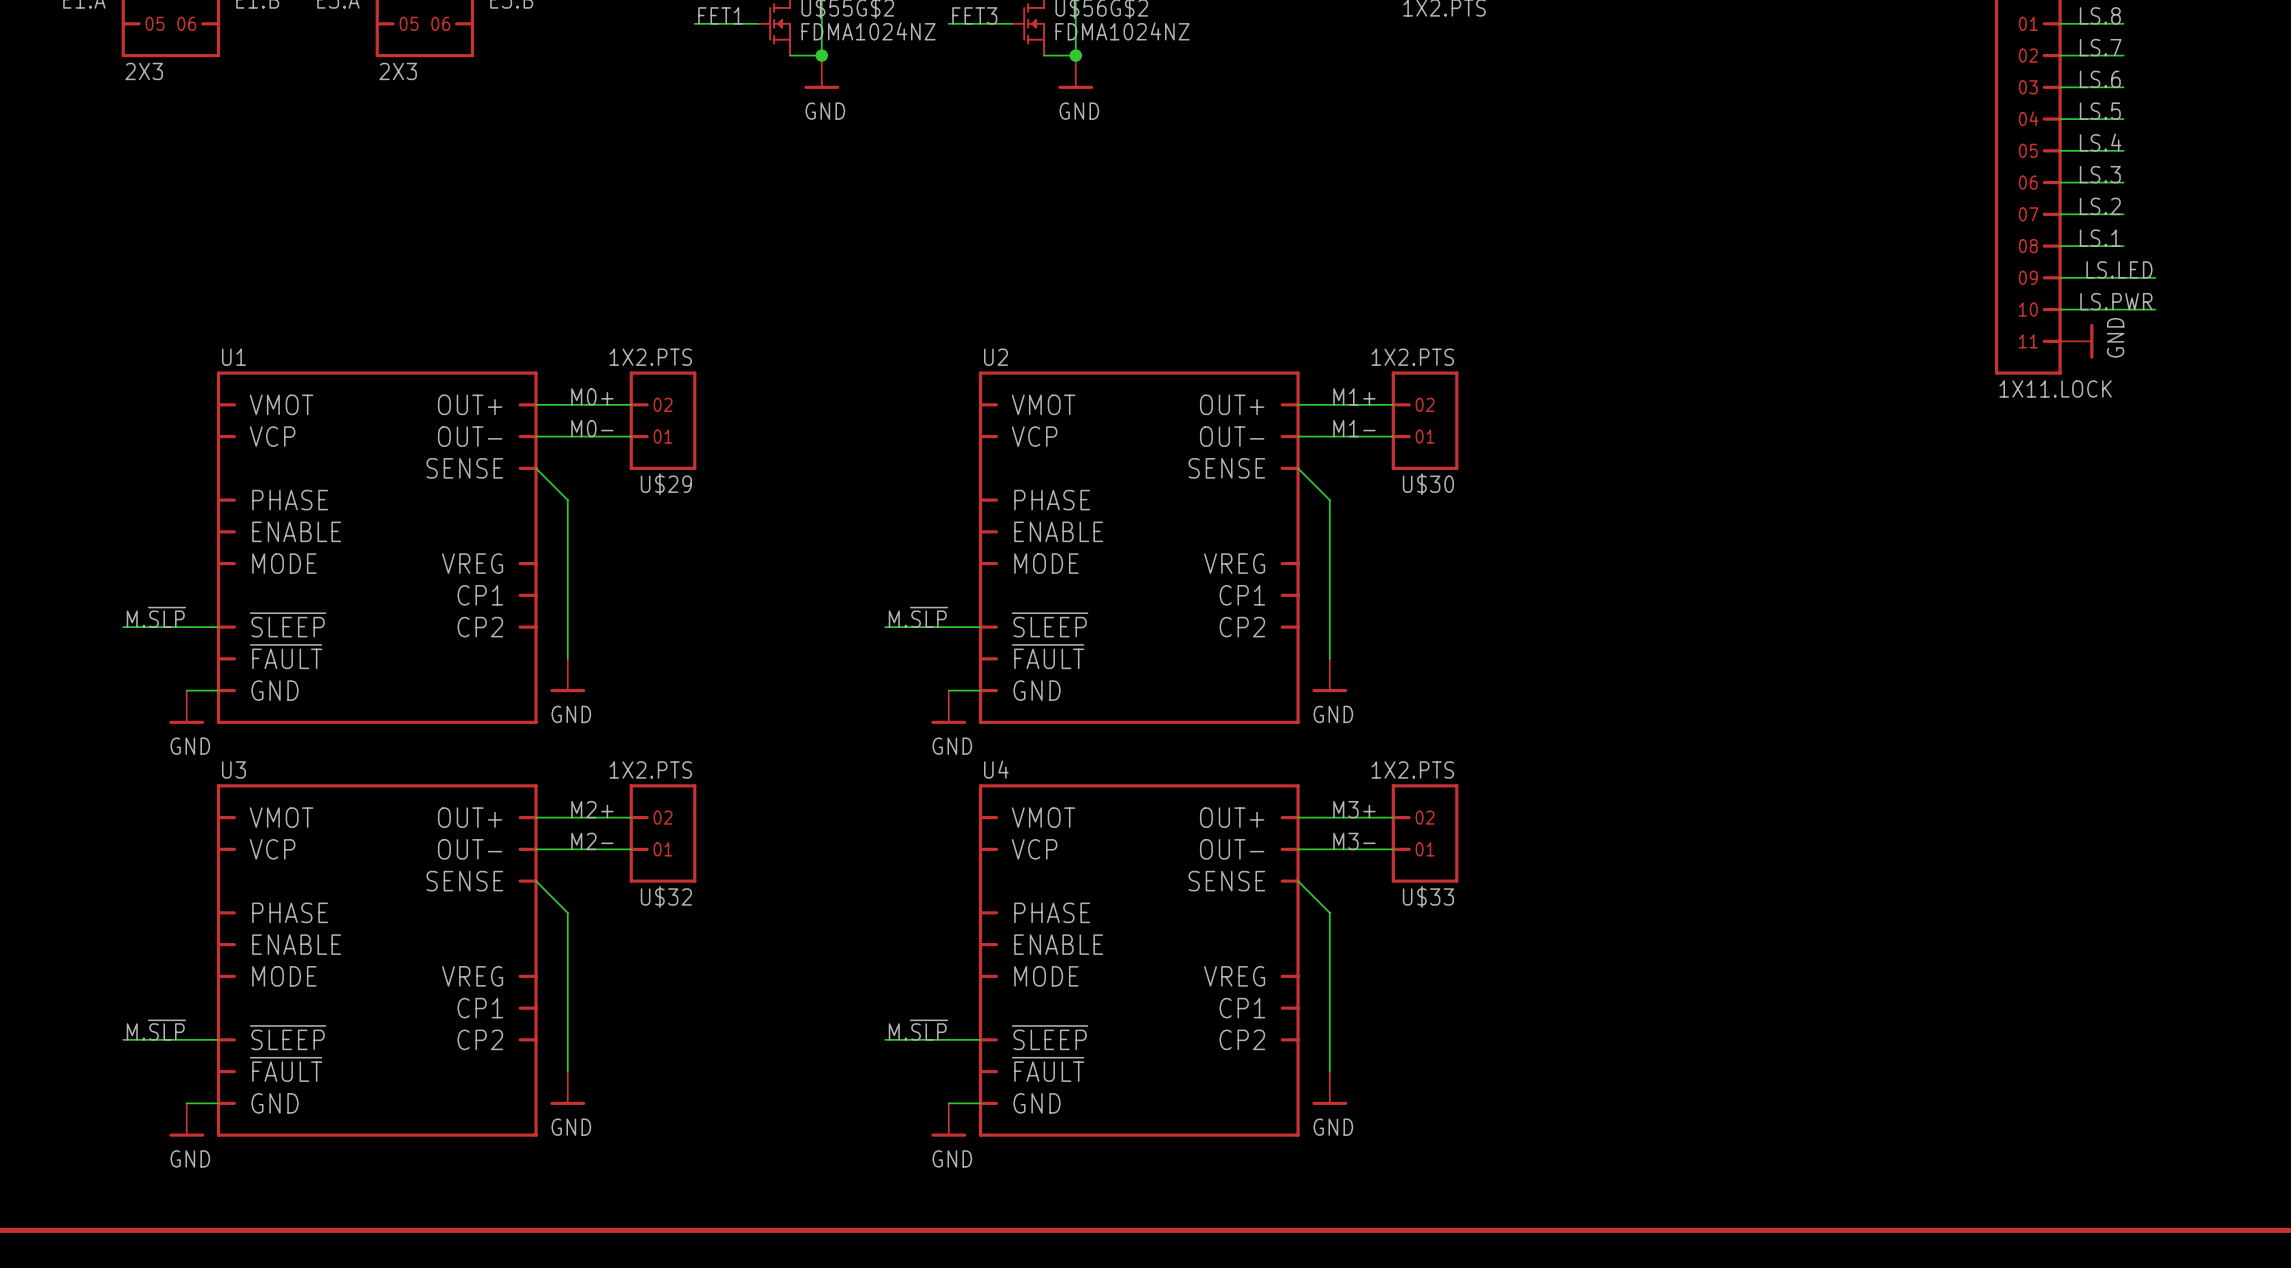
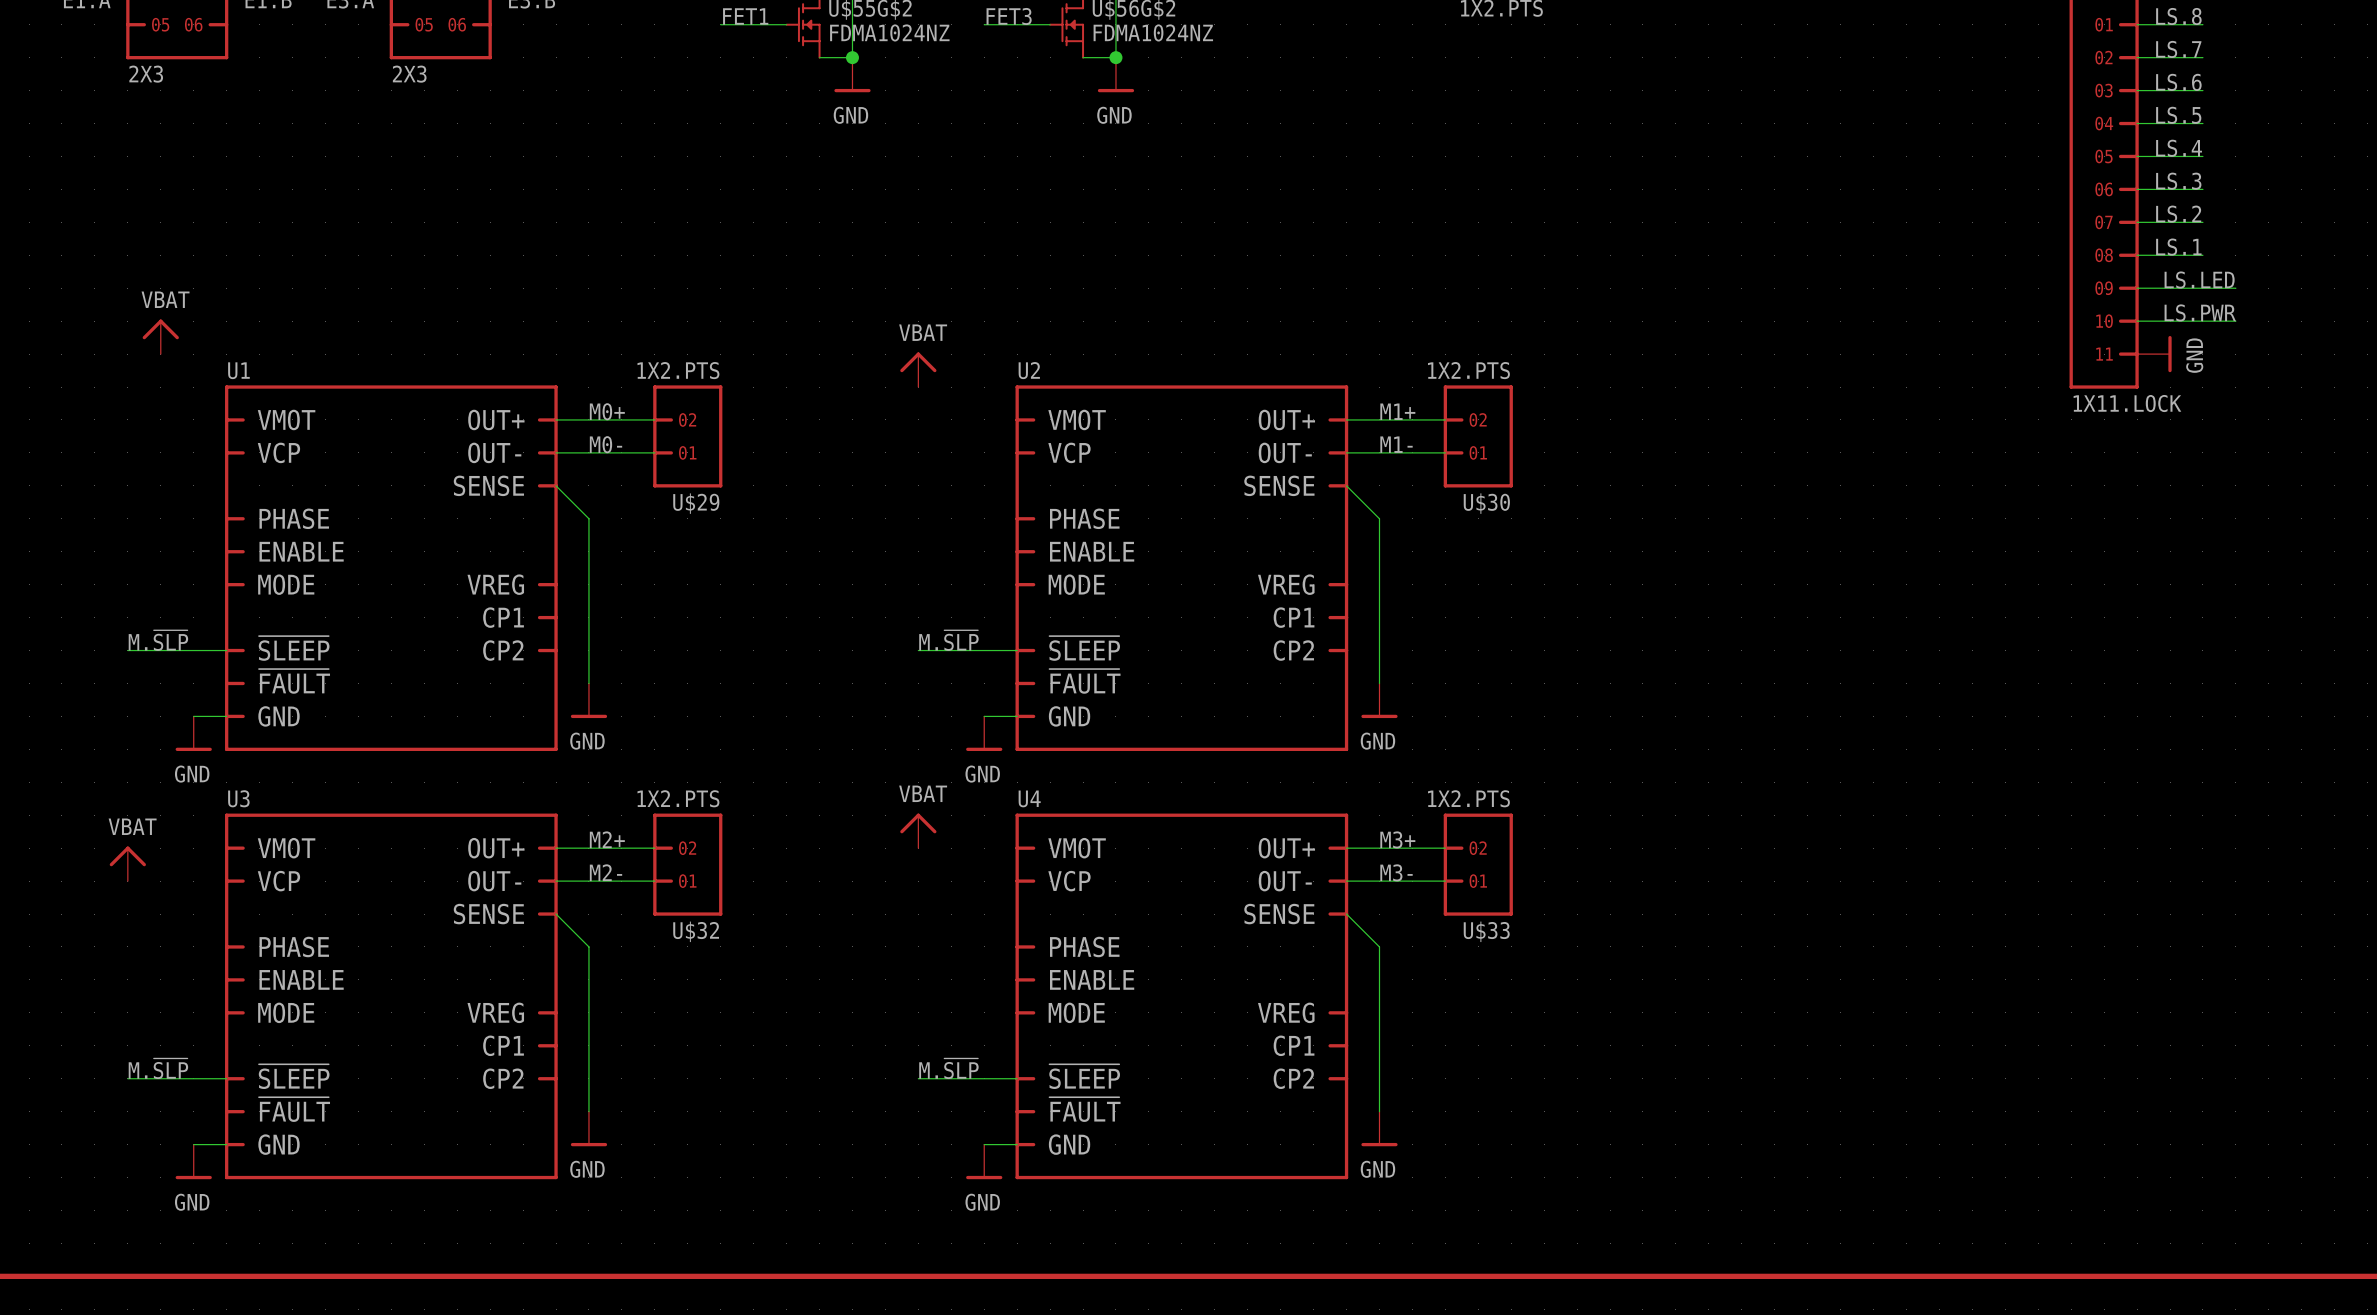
power symbol: none -> VBAT (160, 336)
power symbol: none -> VBAT (918, 369)
power symbol: none -> VBAT (918, 830)
power symbol: none -> VBAT (127, 863)

